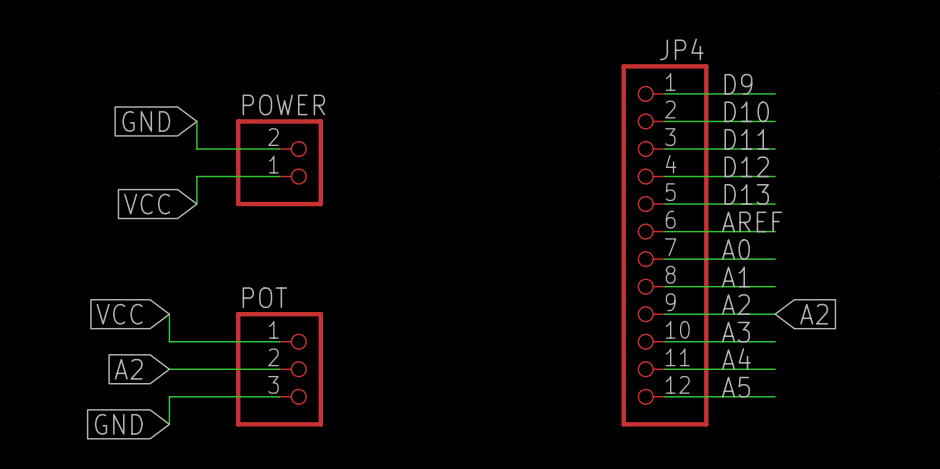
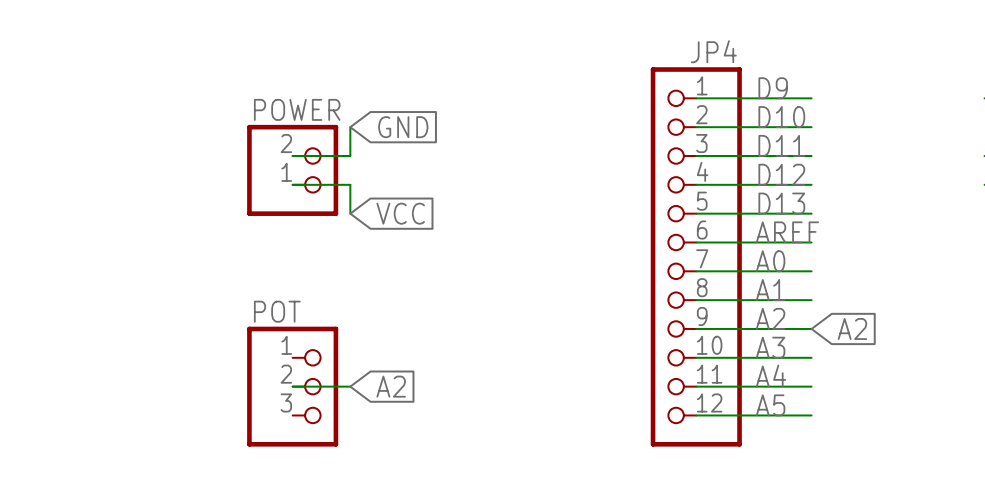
global label rotation: 0° (146, 121) -> 180° (403, 127)
global label position: GND (146, 121) -> GND (403, 127)
wire: (196, 121) (196, 148) (279, 148) -> (350, 127) (350, 156) (292, 156)
wire: (279, 176) (196, 176) (196, 204) -> (292, 184) (350, 184) (350, 213)
global label: VCC (147, 204) -> none
global label: none -> VCC (400, 213)
global label: VCC (119, 314) -> none
wire: (169, 314) (169, 341) (279, 341) -> none
global label rotation: 0° (128, 369) -> 180° (391, 386)
global label position: A2 (128, 369) -> A2 (391, 386)
wire: (169, 369) (279, 369) -> (350, 386) (292, 386)
wire: (279, 396) (169, 396) (169, 424) -> none
global label: GND (118, 424) -> none

